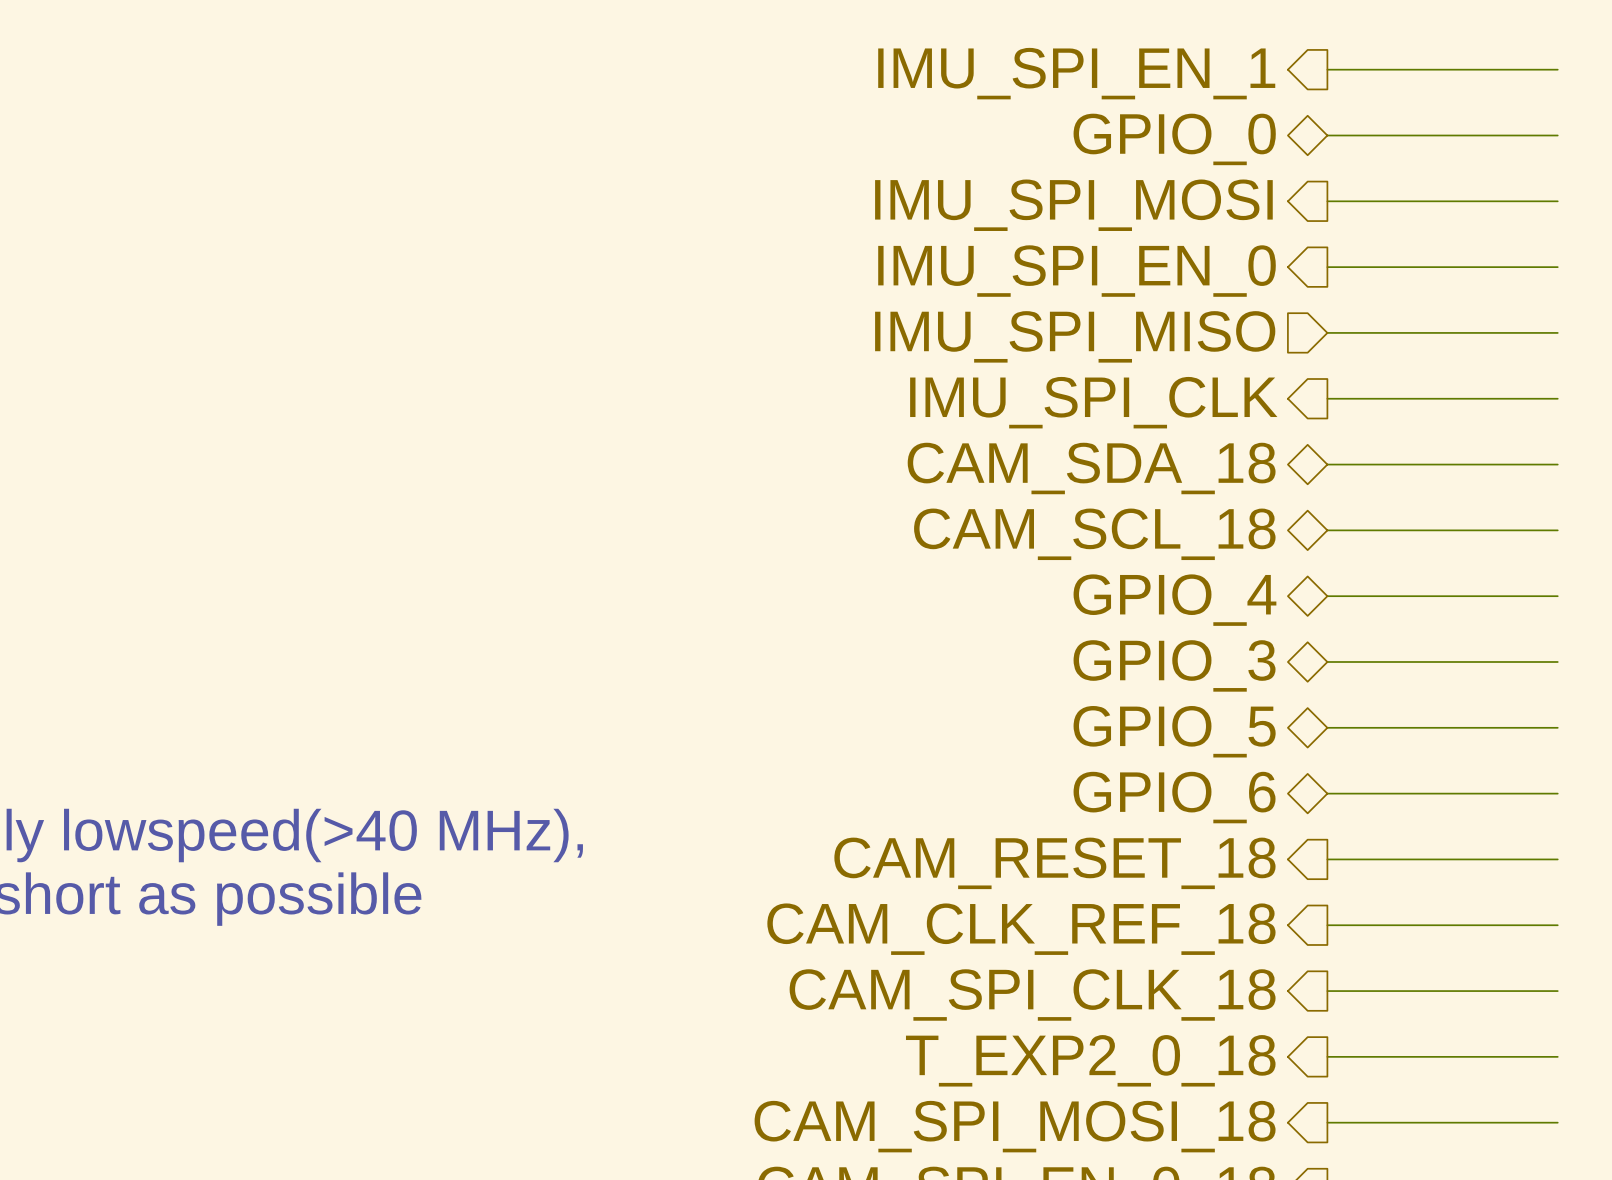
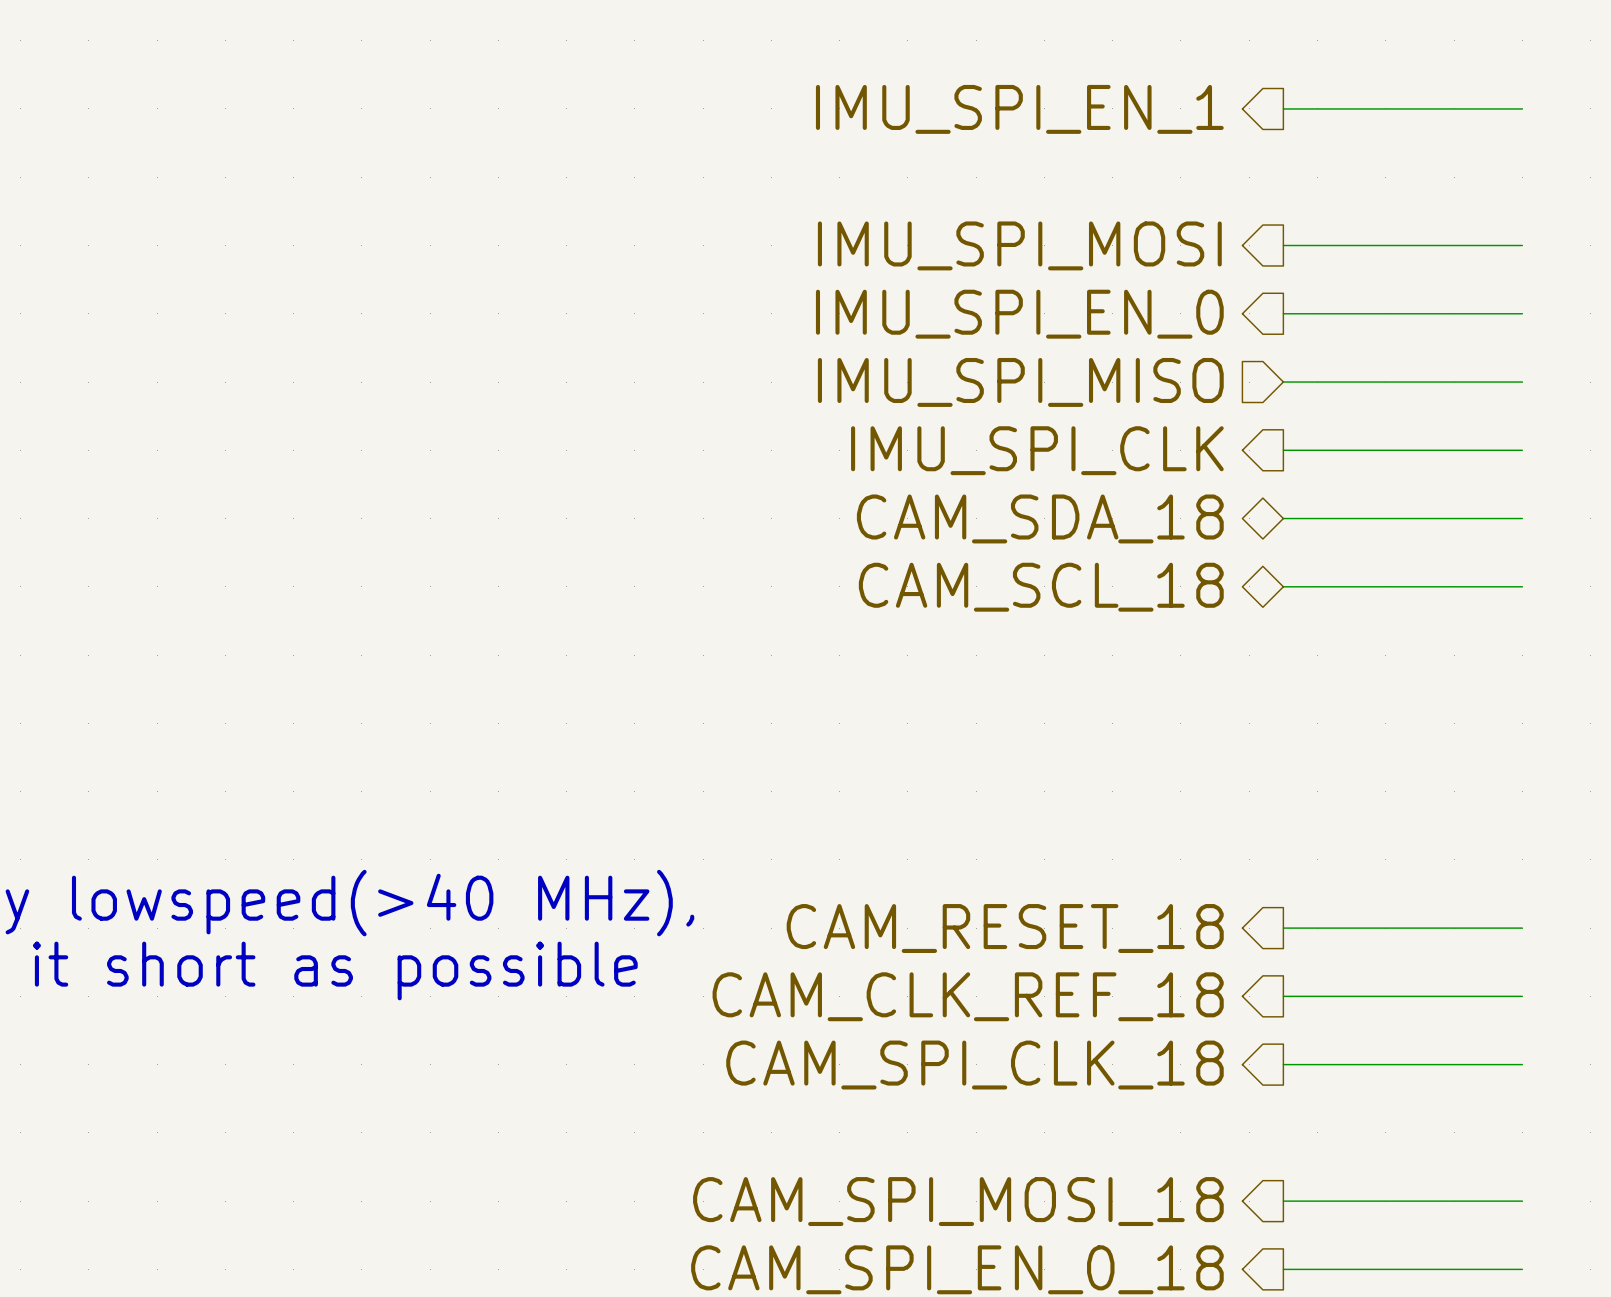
wire: (1327, 135) (1557, 135) -> none
hierarchical label: GPIO_0 (1174, 139) -> none
wire: (1327, 596) (1557, 596) -> none
hierarchical label: GPIO_4 (1174, 600) -> none
wire: (1327, 661) (1557, 661) -> none
hierarchical label: GPIO_3 (1174, 665) -> none
wire: (1327, 727) (1557, 727) -> none
hierarchical label: GPIO_5 (1174, 731) -> none
wire: (1327, 793) (1557, 793) -> none
hierarchical label: GPIO_6 (1174, 797) -> none
wire: (1327, 1056) (1557, 1056) -> none
hierarchical label: T_EXP2_0_18 (1090, 1060) -> none

